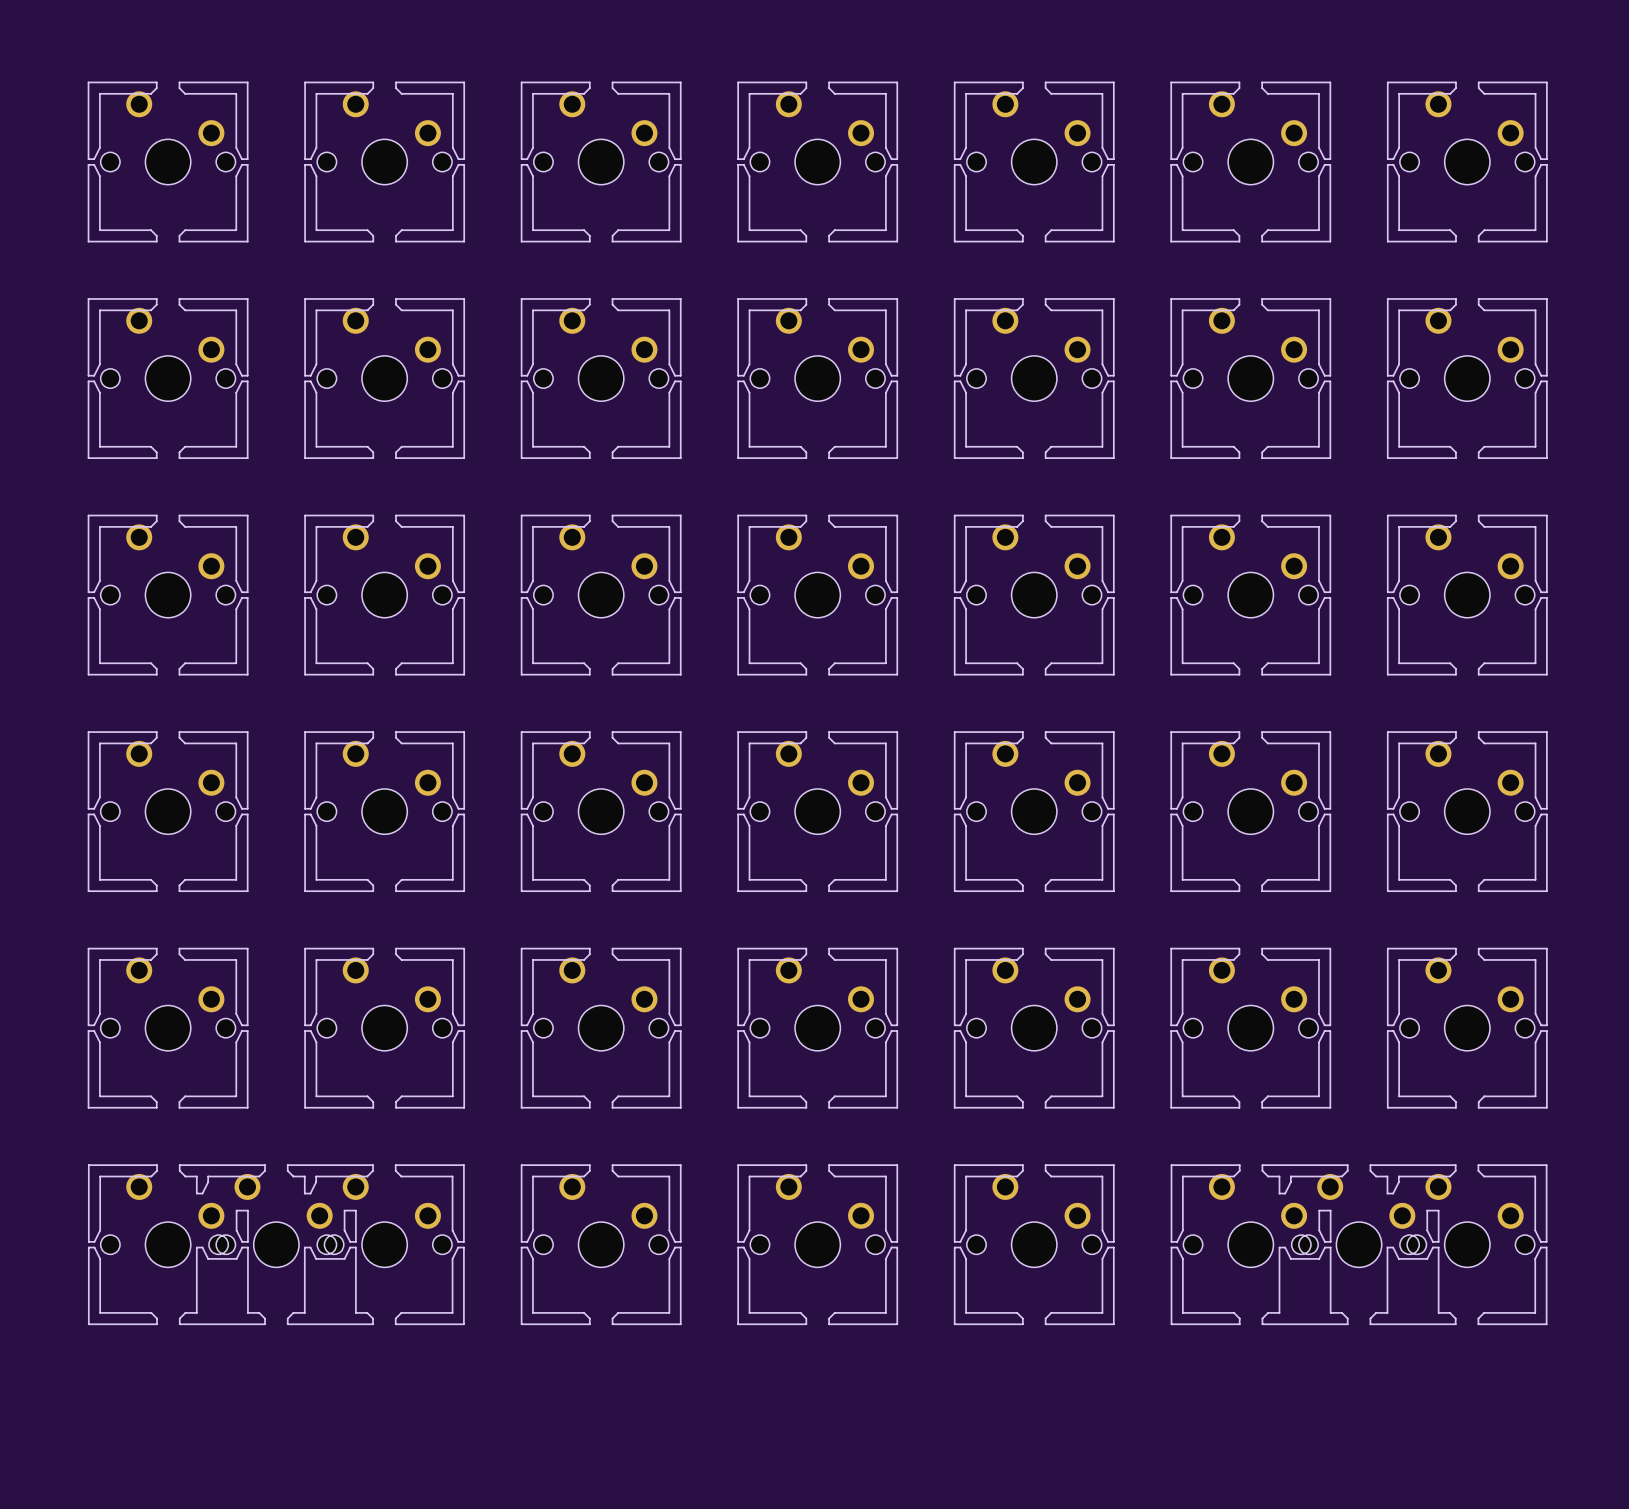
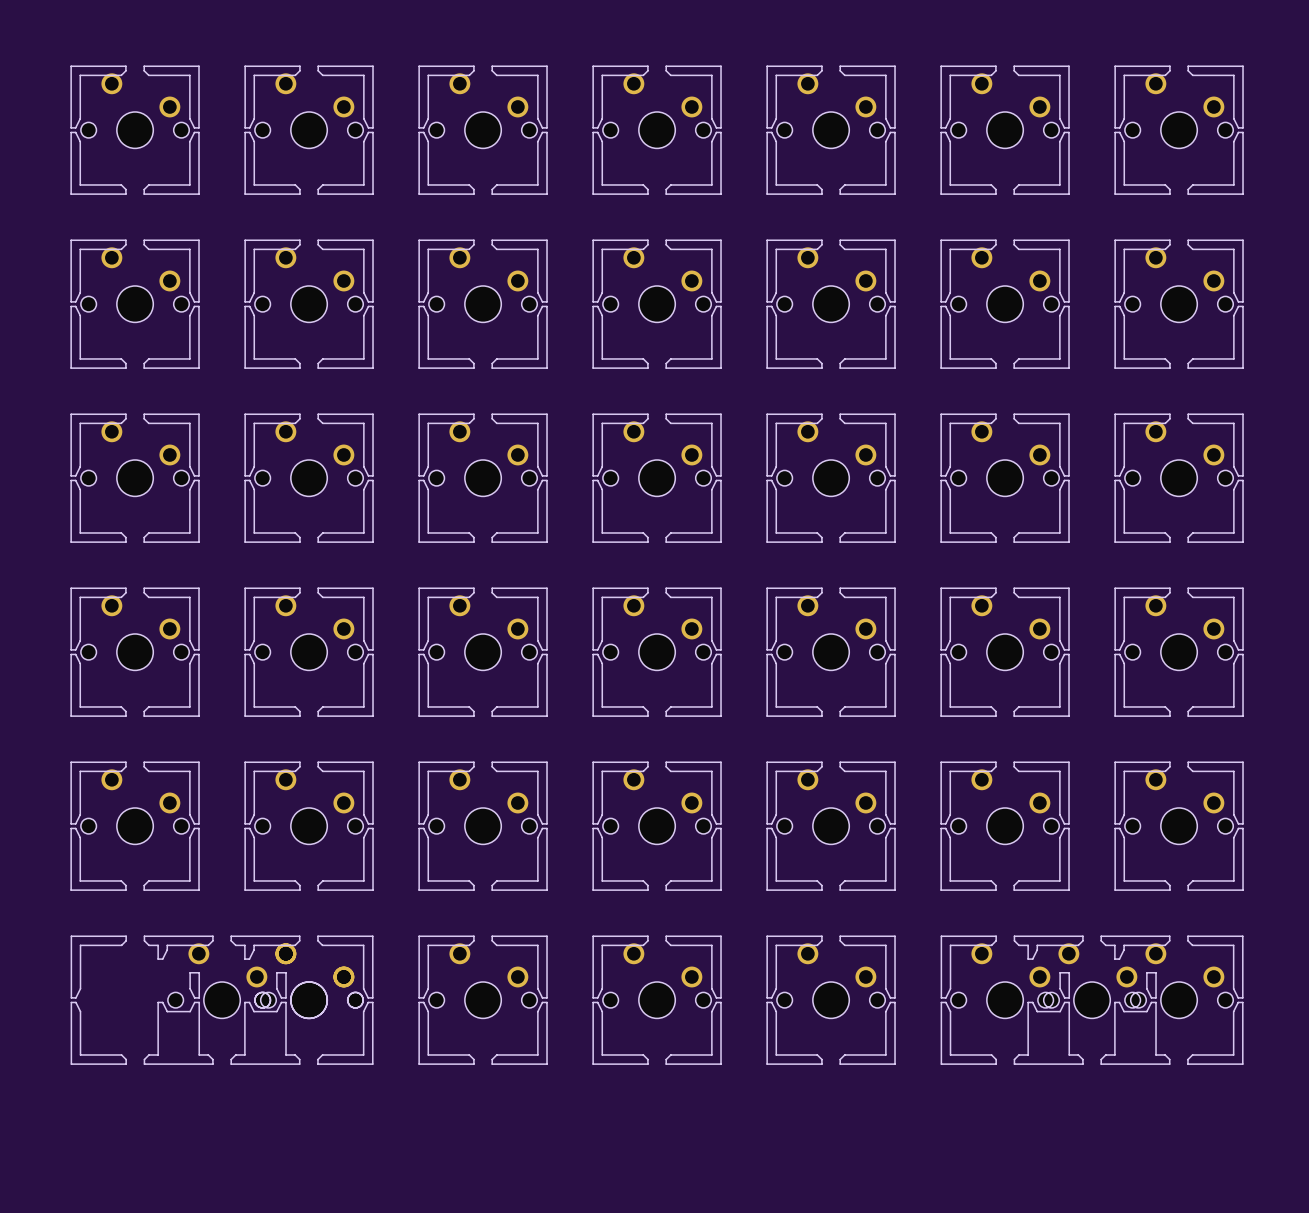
part position: (168, 1220) -> (309, 980)

